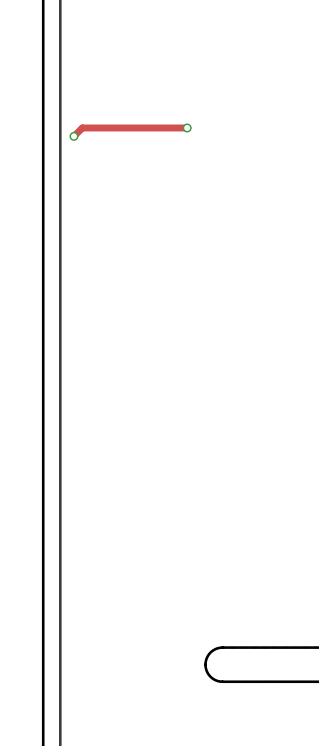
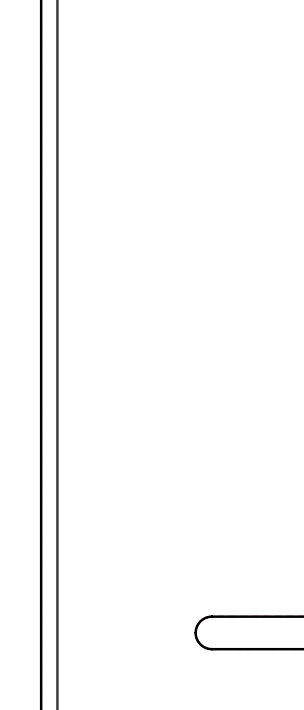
track: (187, 127) (82, 127) (73, 136) -> none
via: (187, 127) -> none
via: (73, 136) -> none

